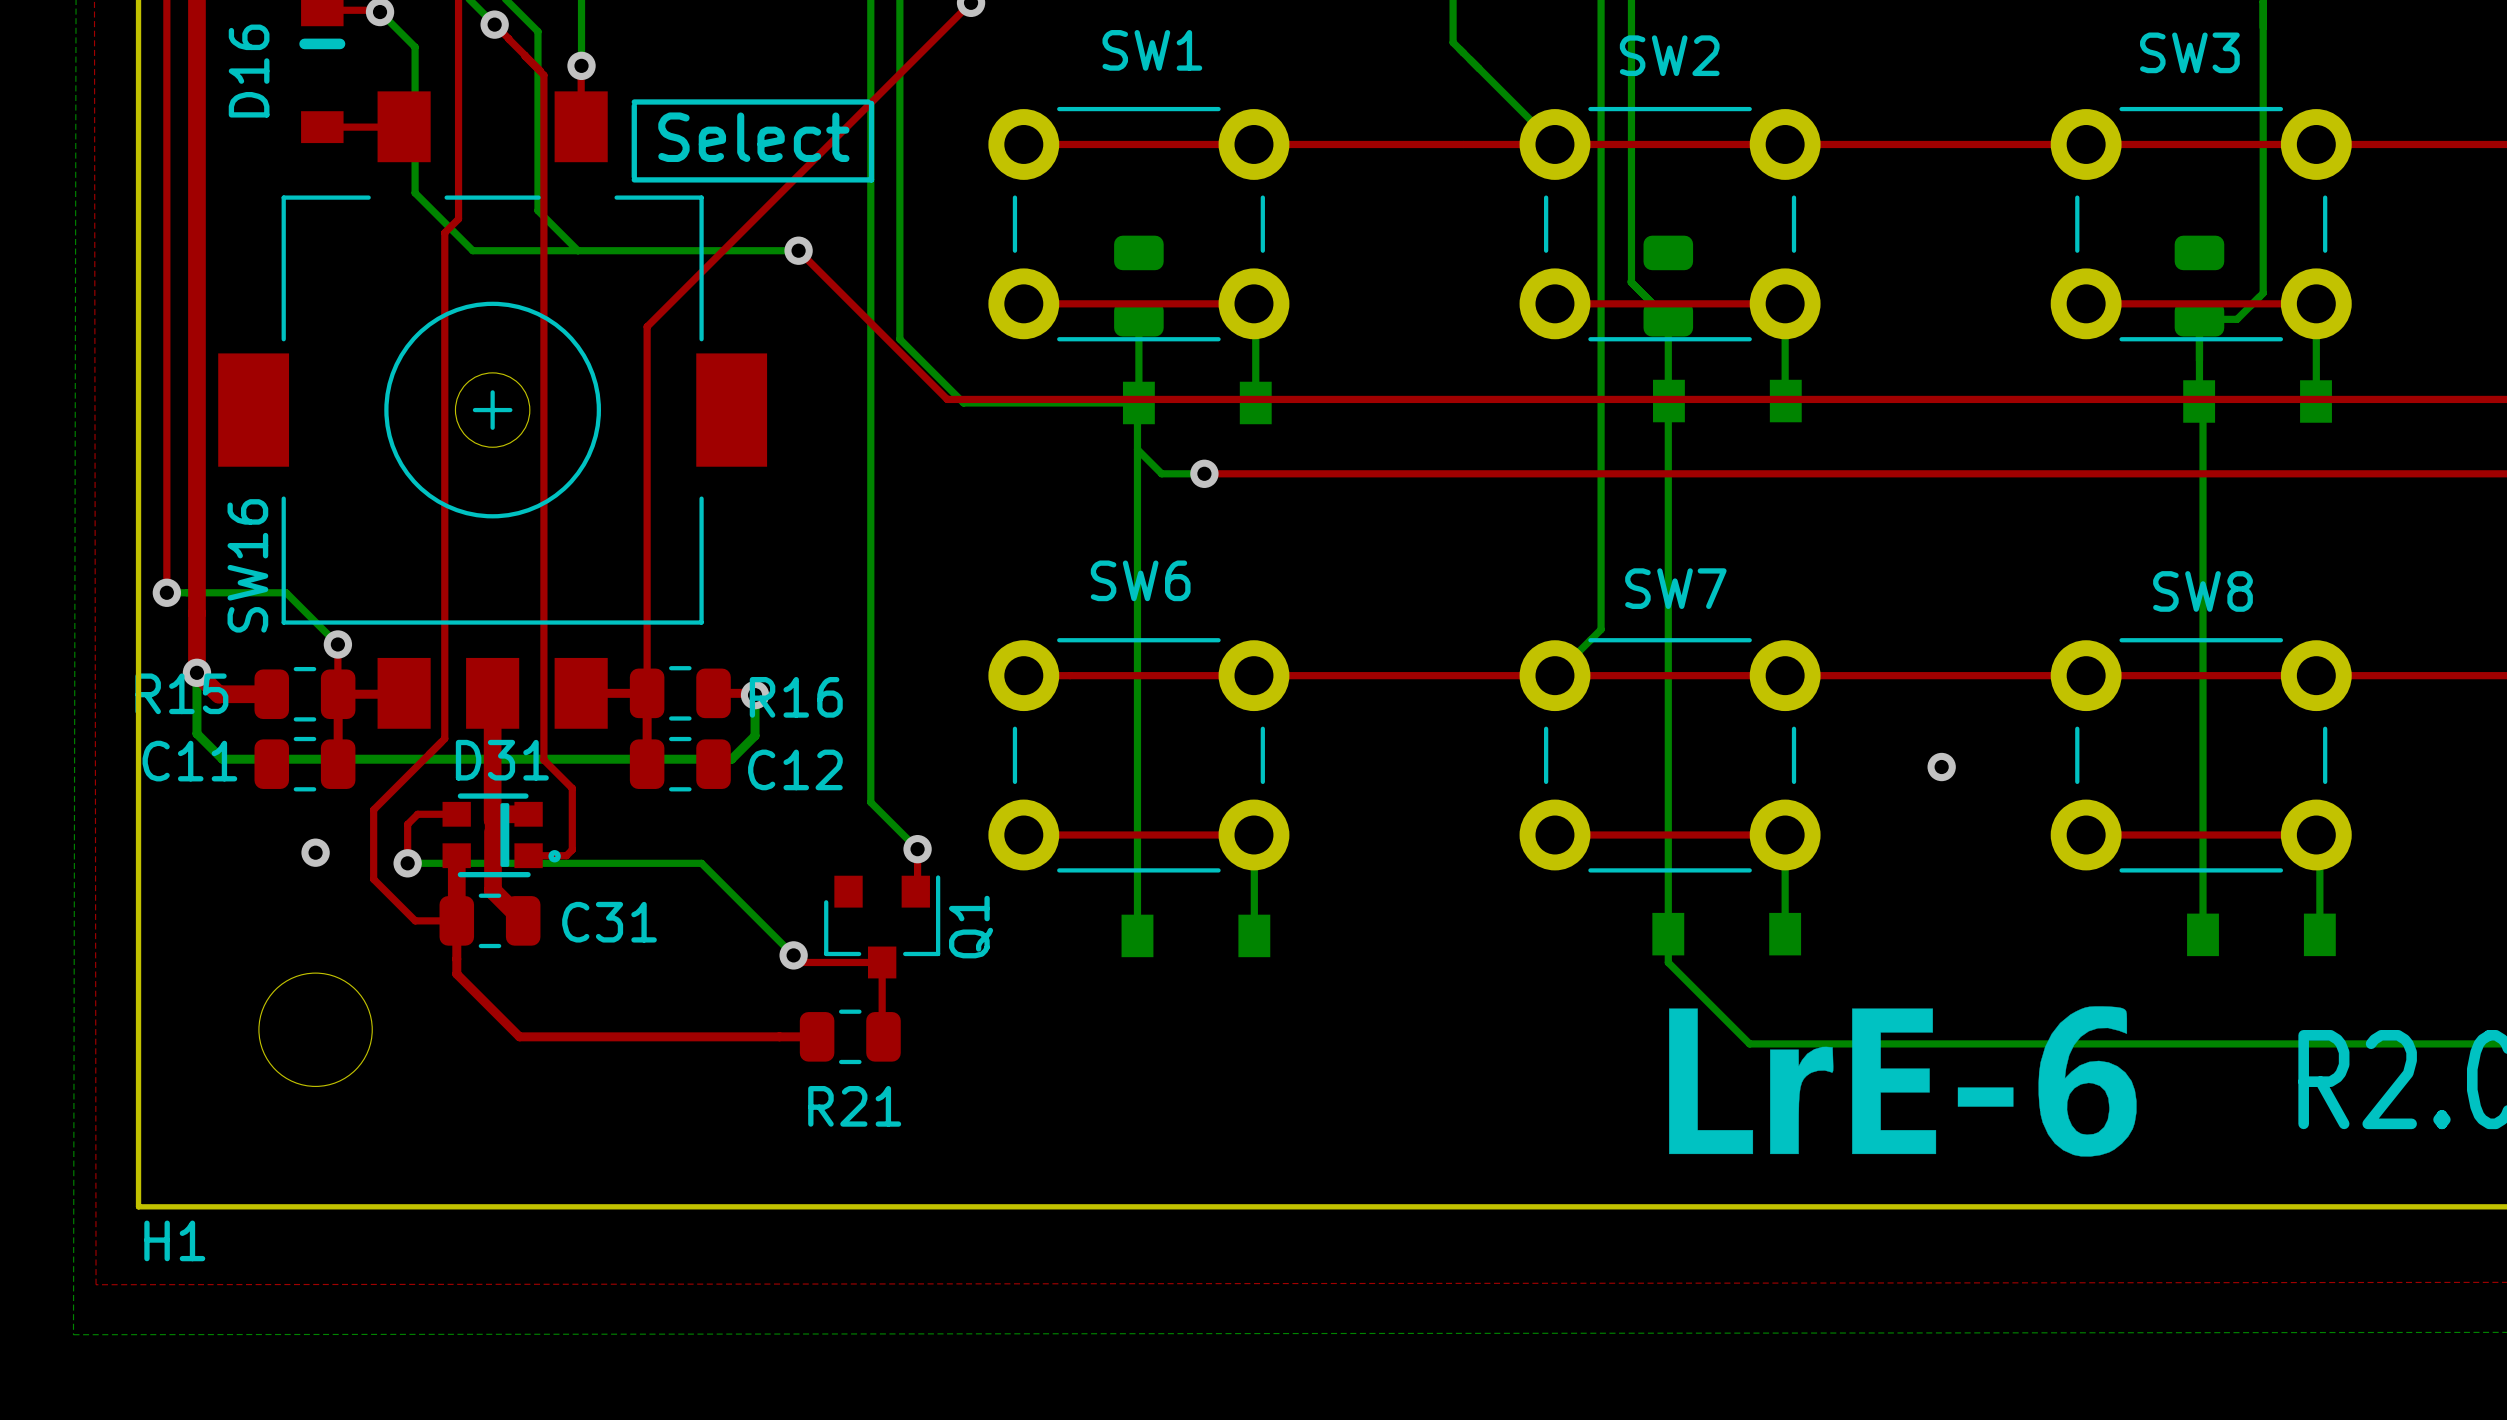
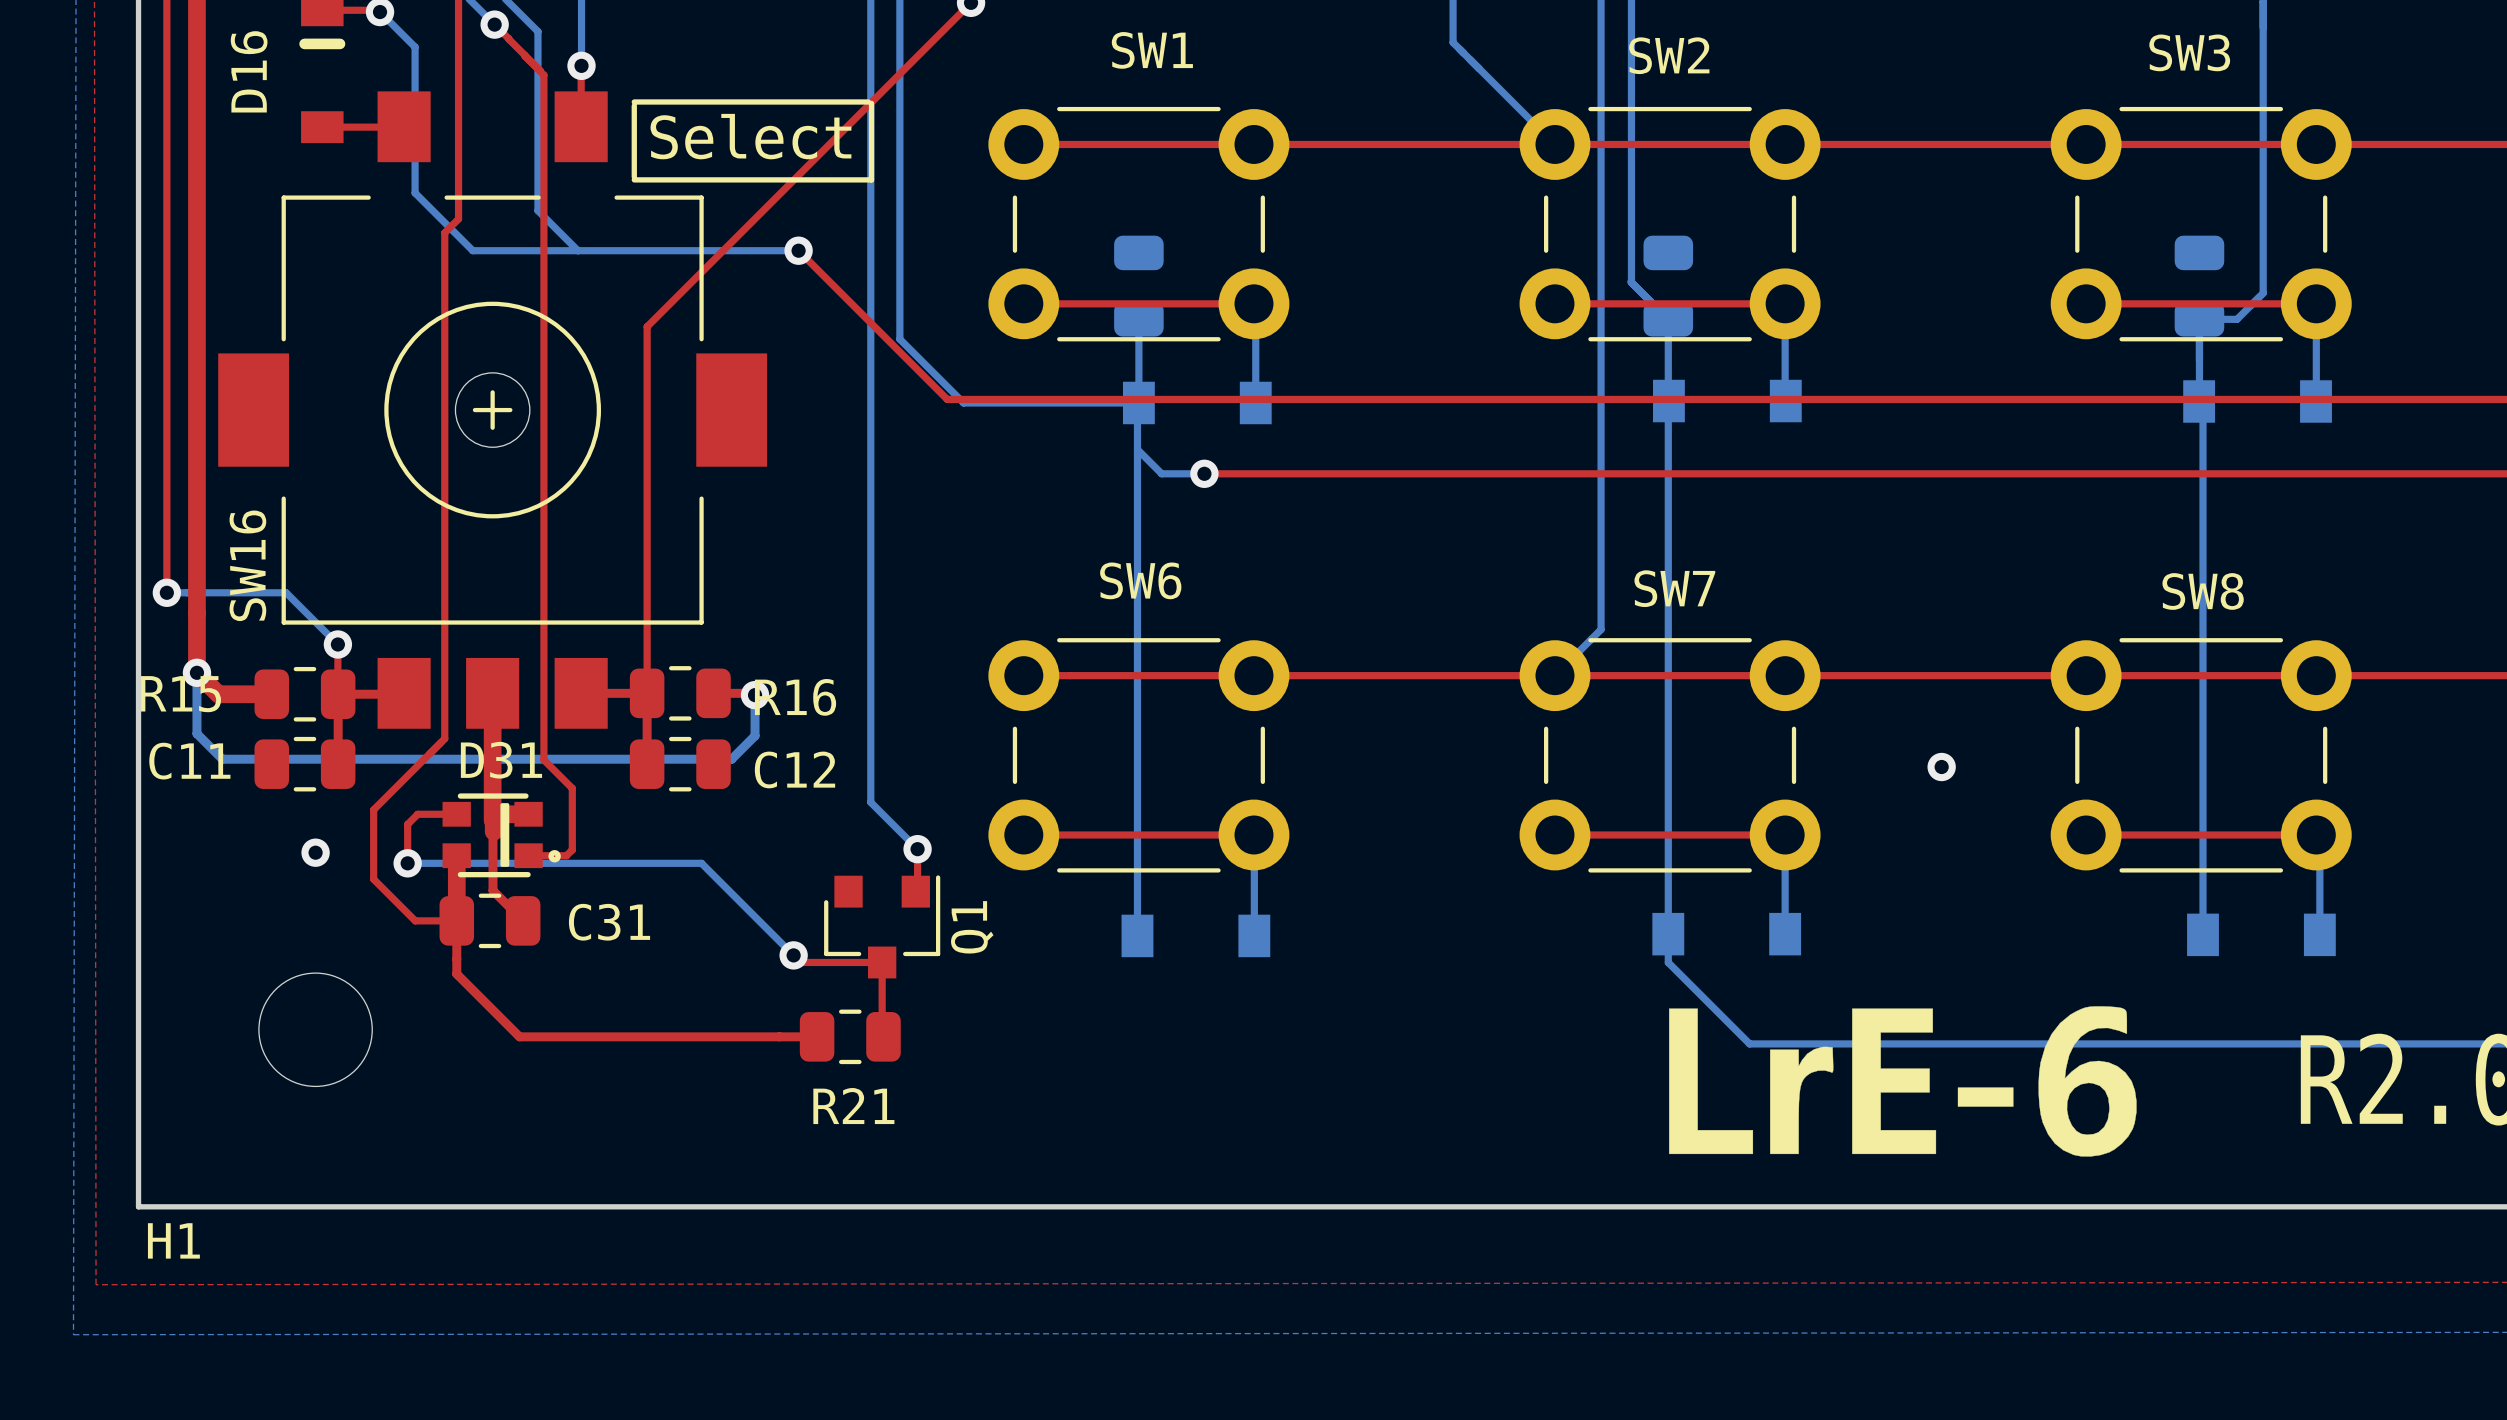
top track width: thick (492, 832) (492, 890) (523, 920) -> thin (492, 832) (492, 890) (523, 920)

